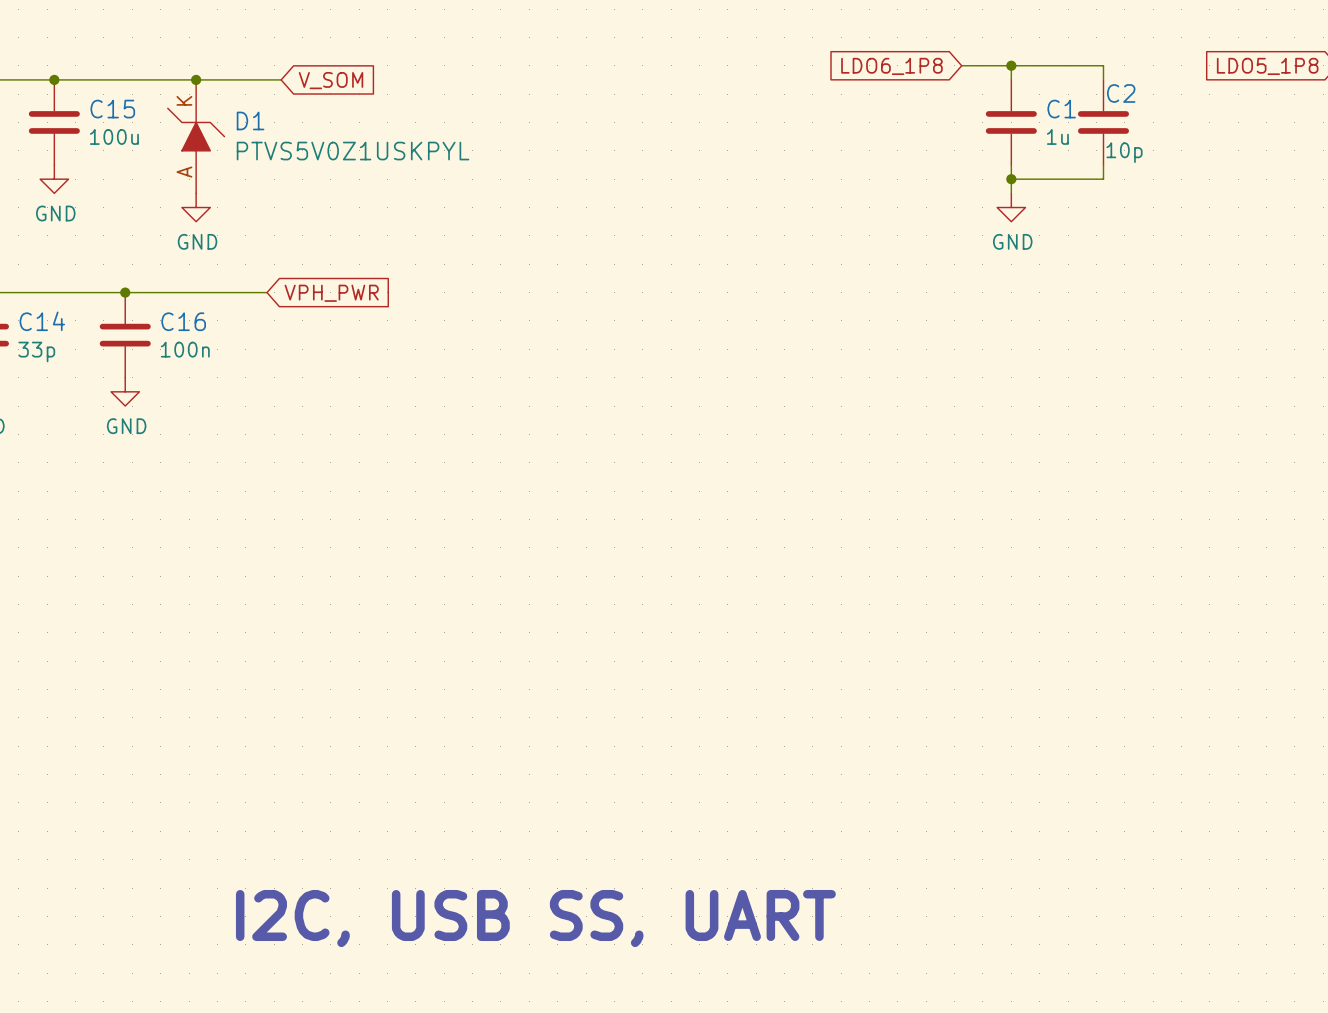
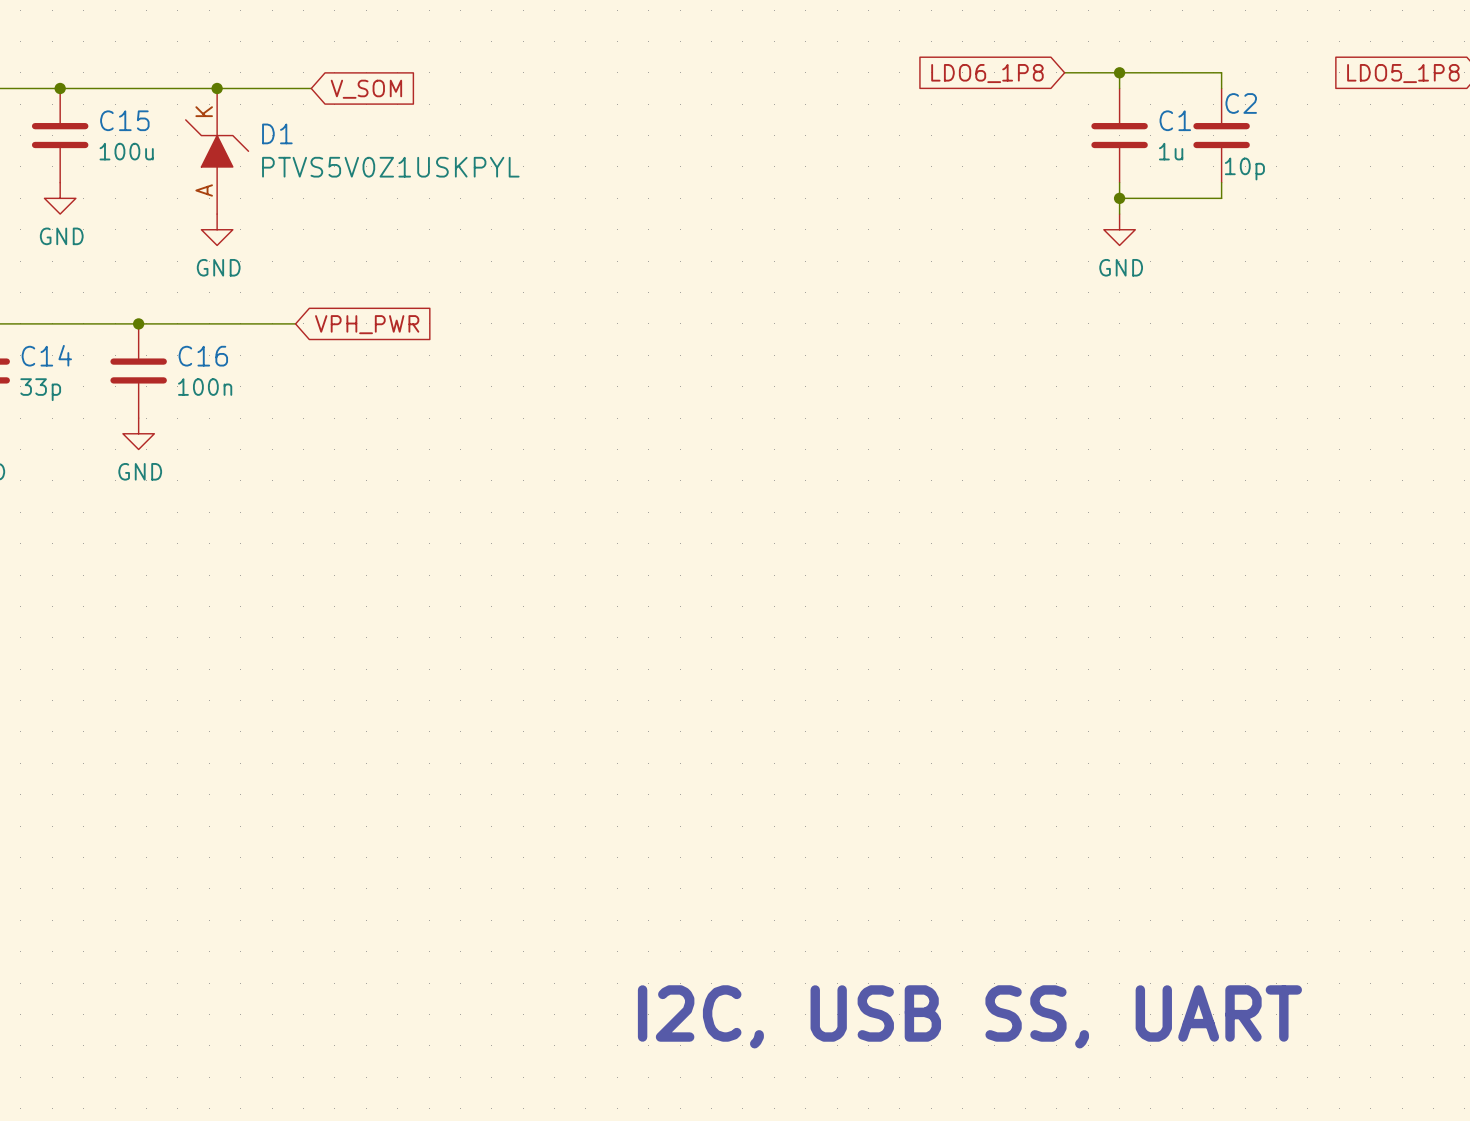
text: I2C, USB SS, UART (535, 918) -> none
text: none -> I2C, USB SS, UART (969, 1016)

